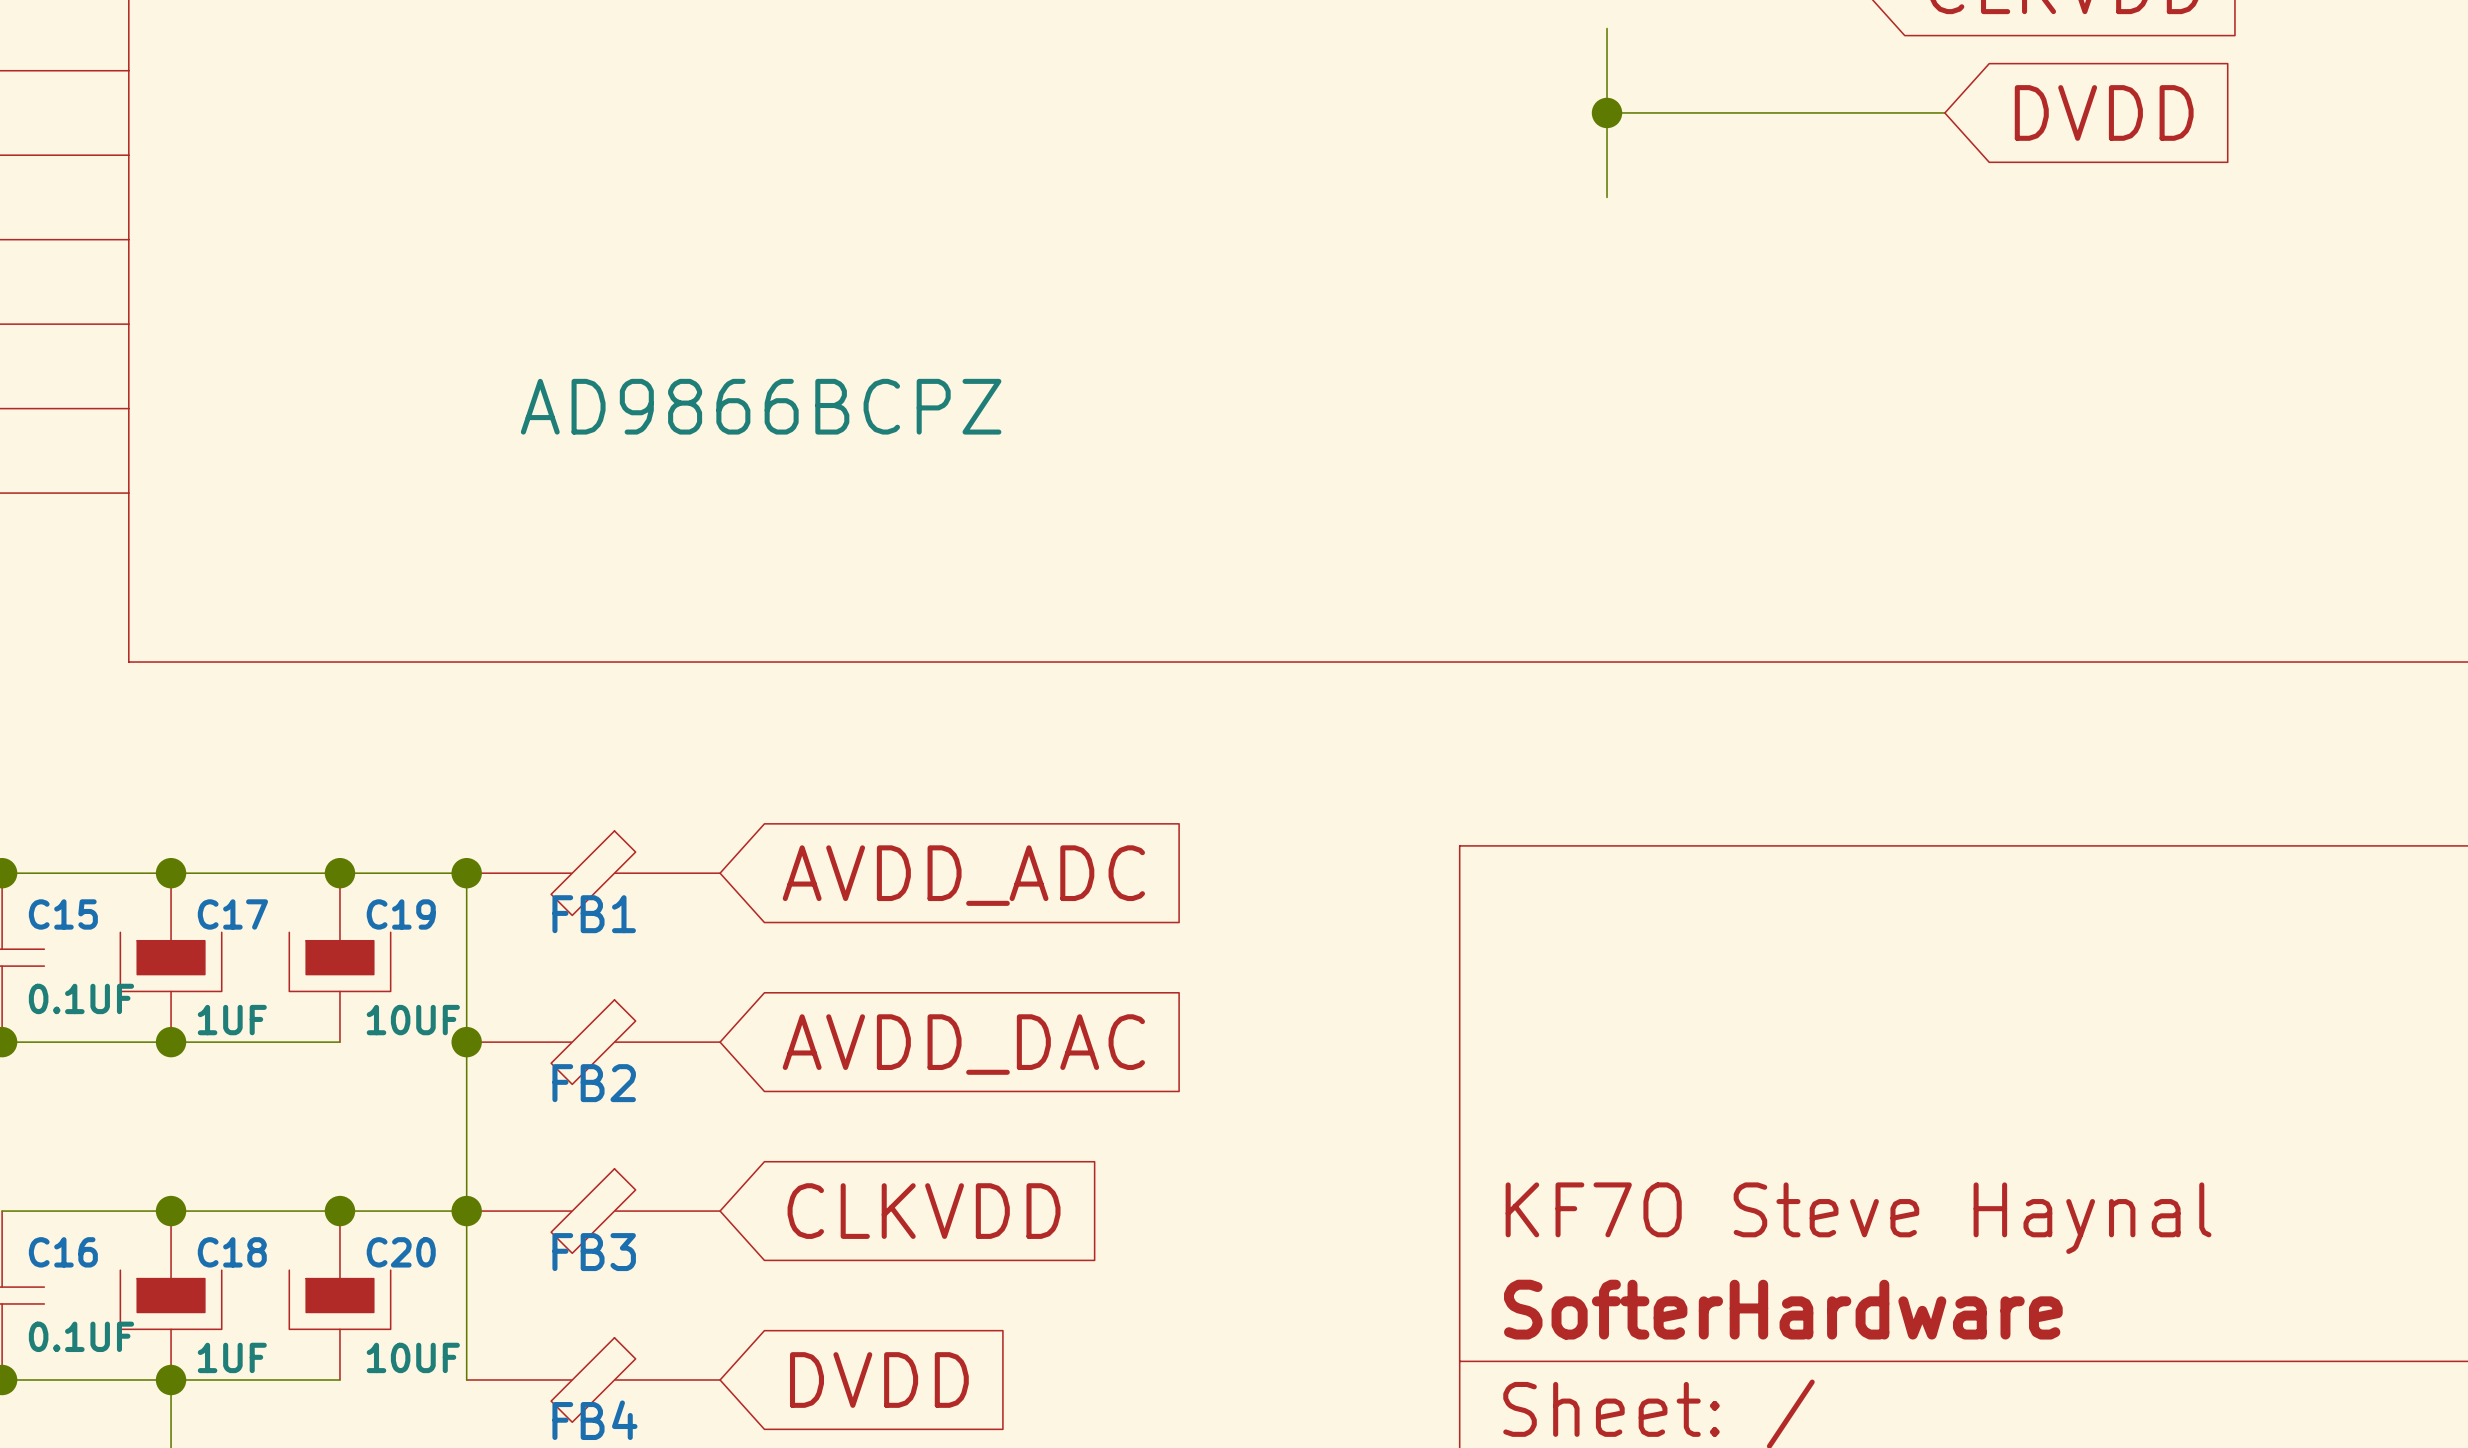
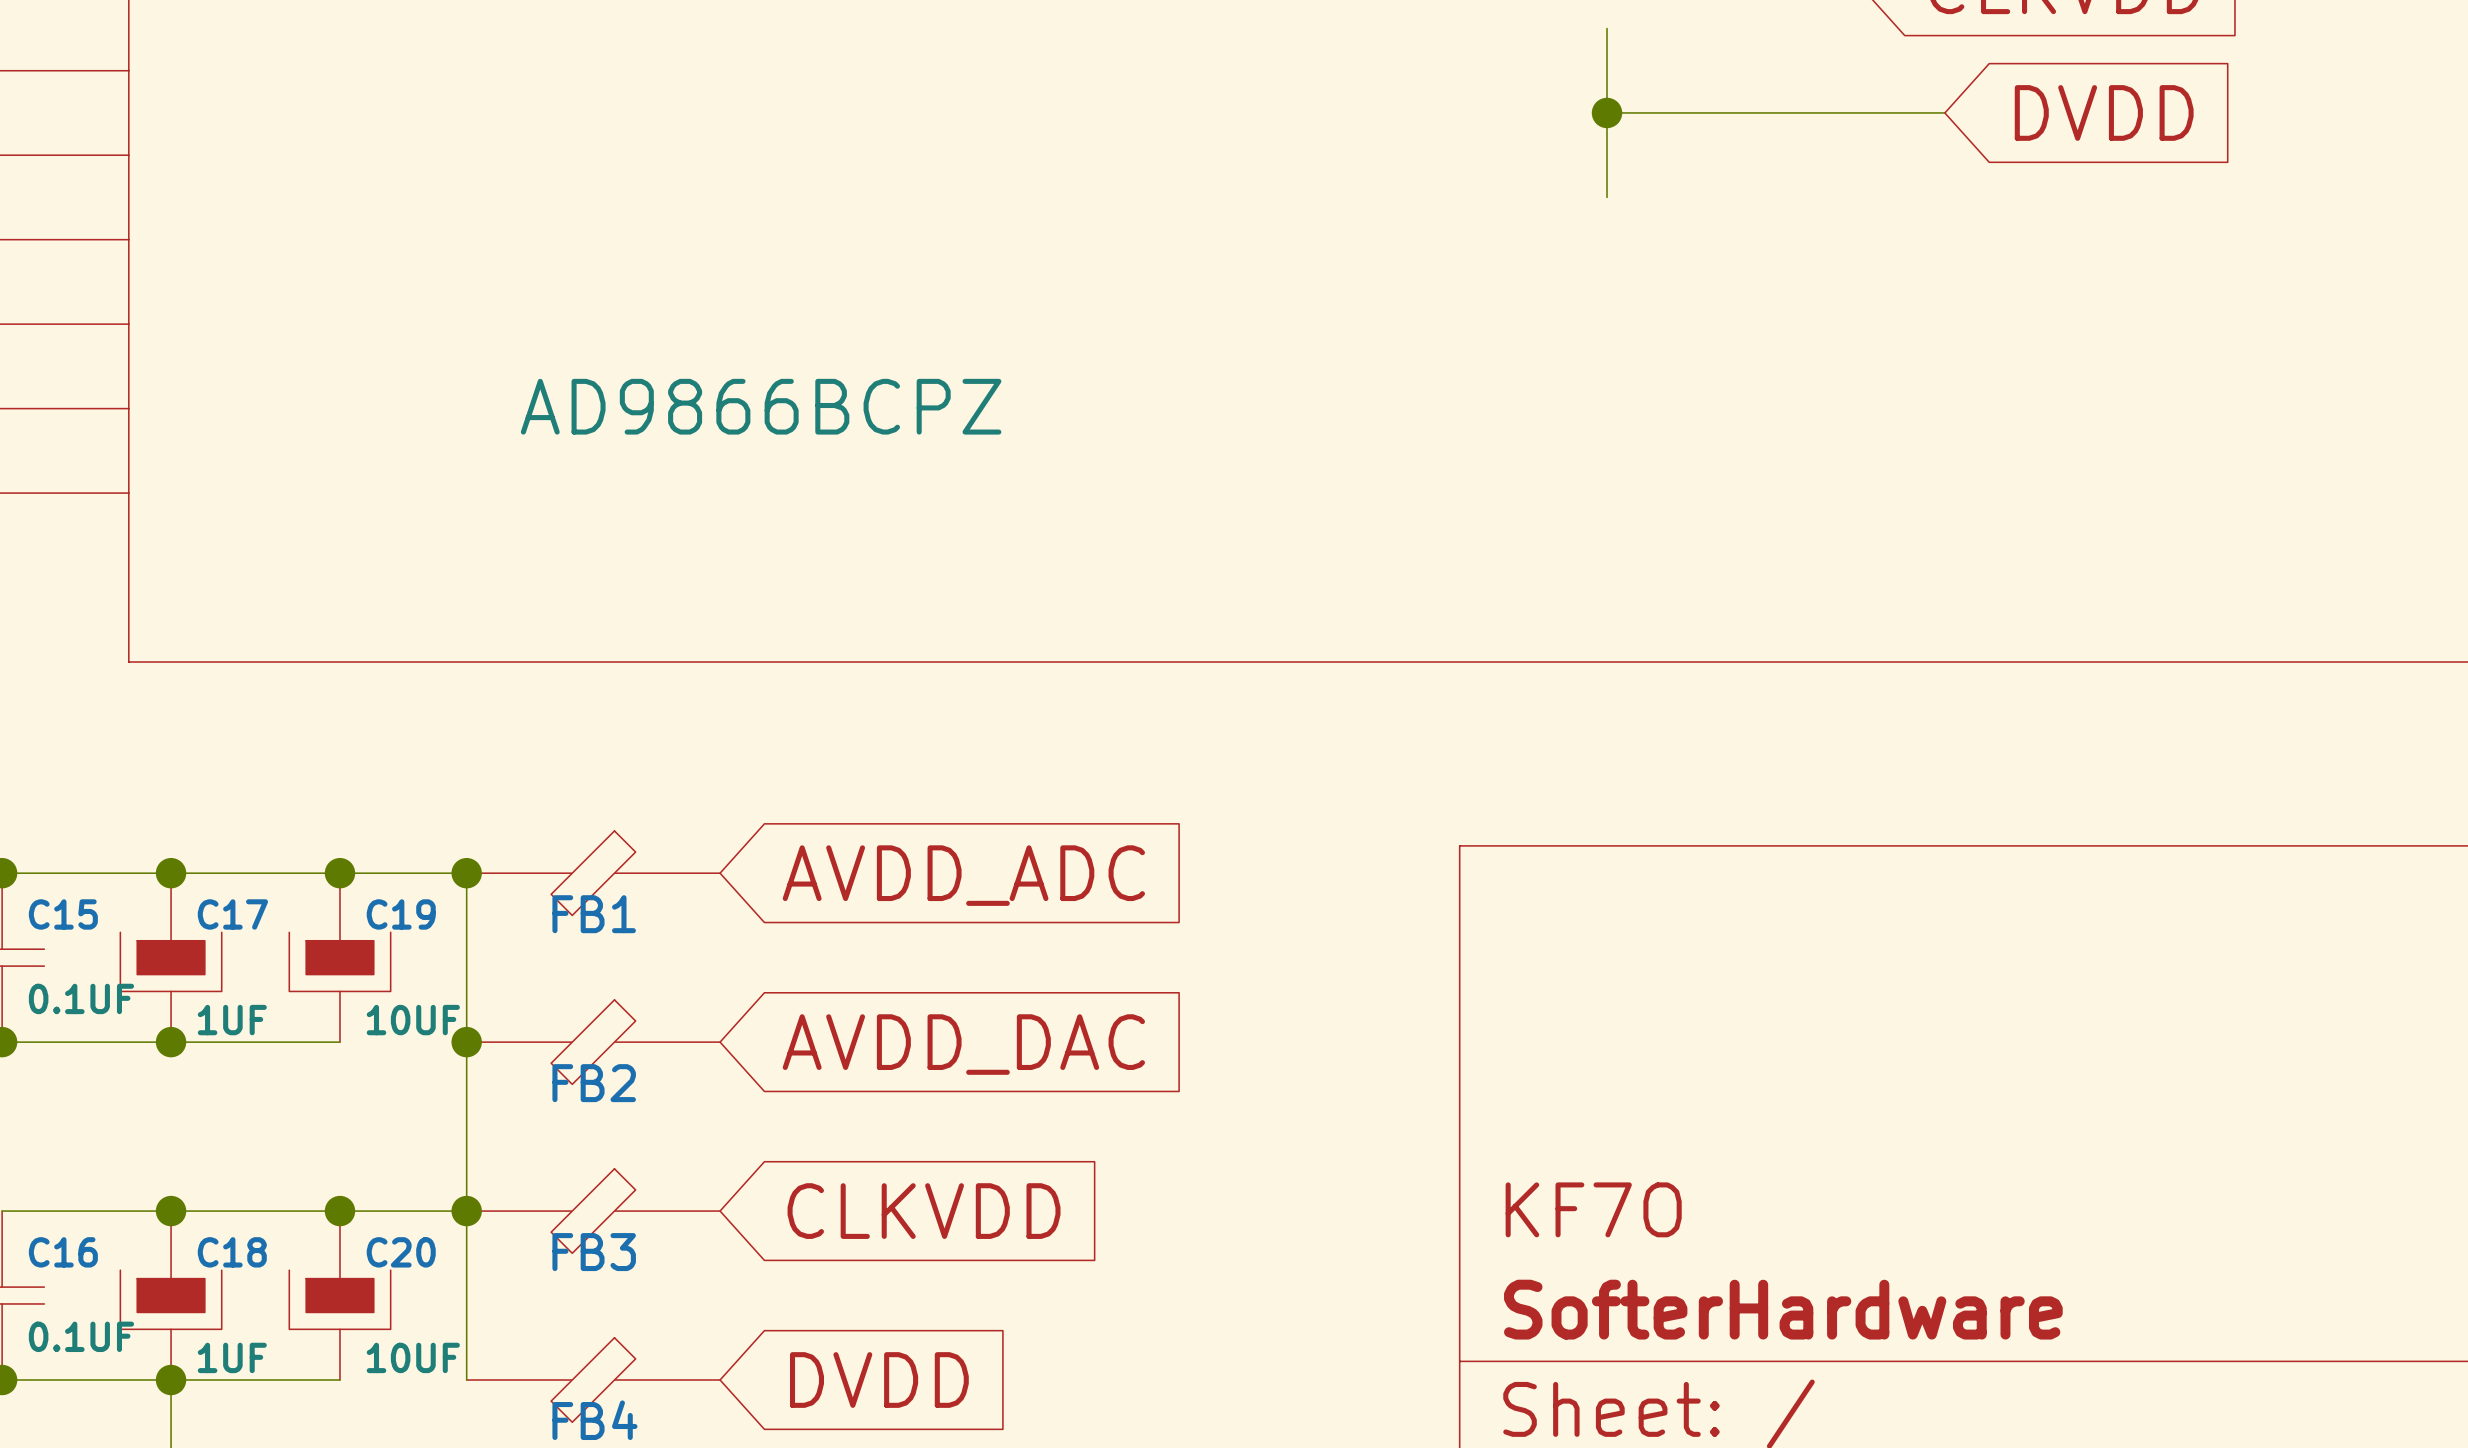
title block: KF7O Steve Haynal (1858, 1218) -> KF7O (1593, 1209)

